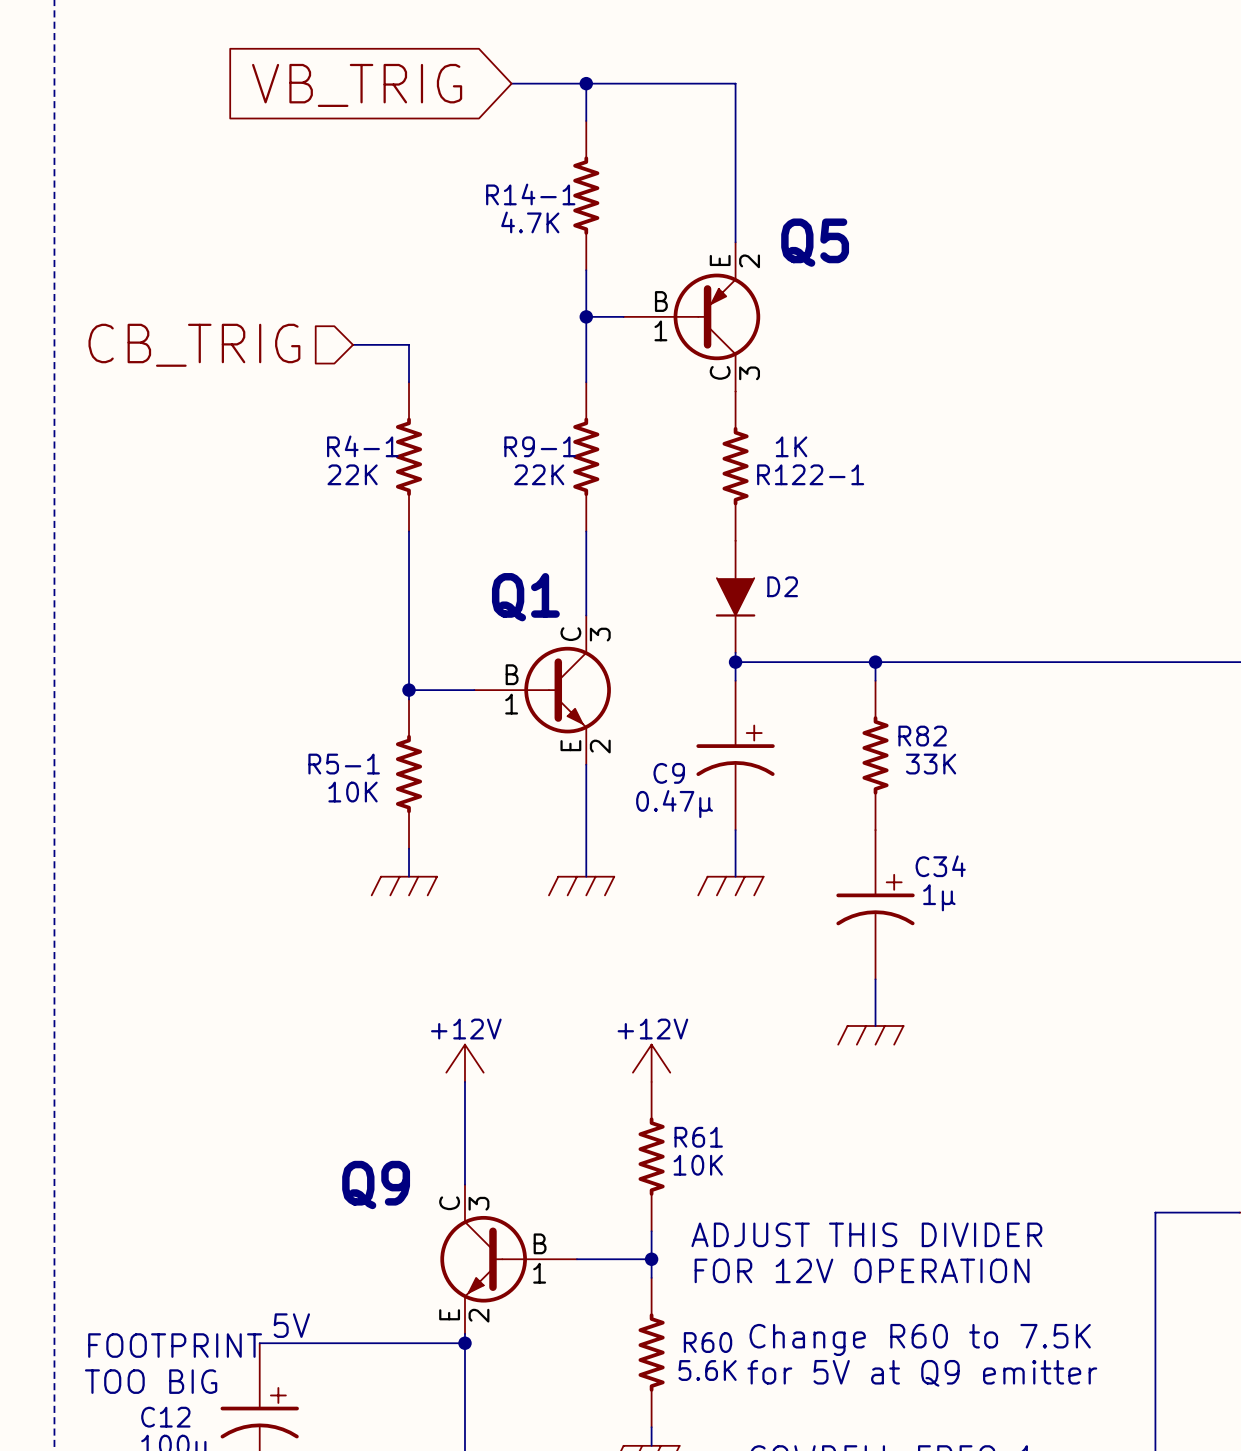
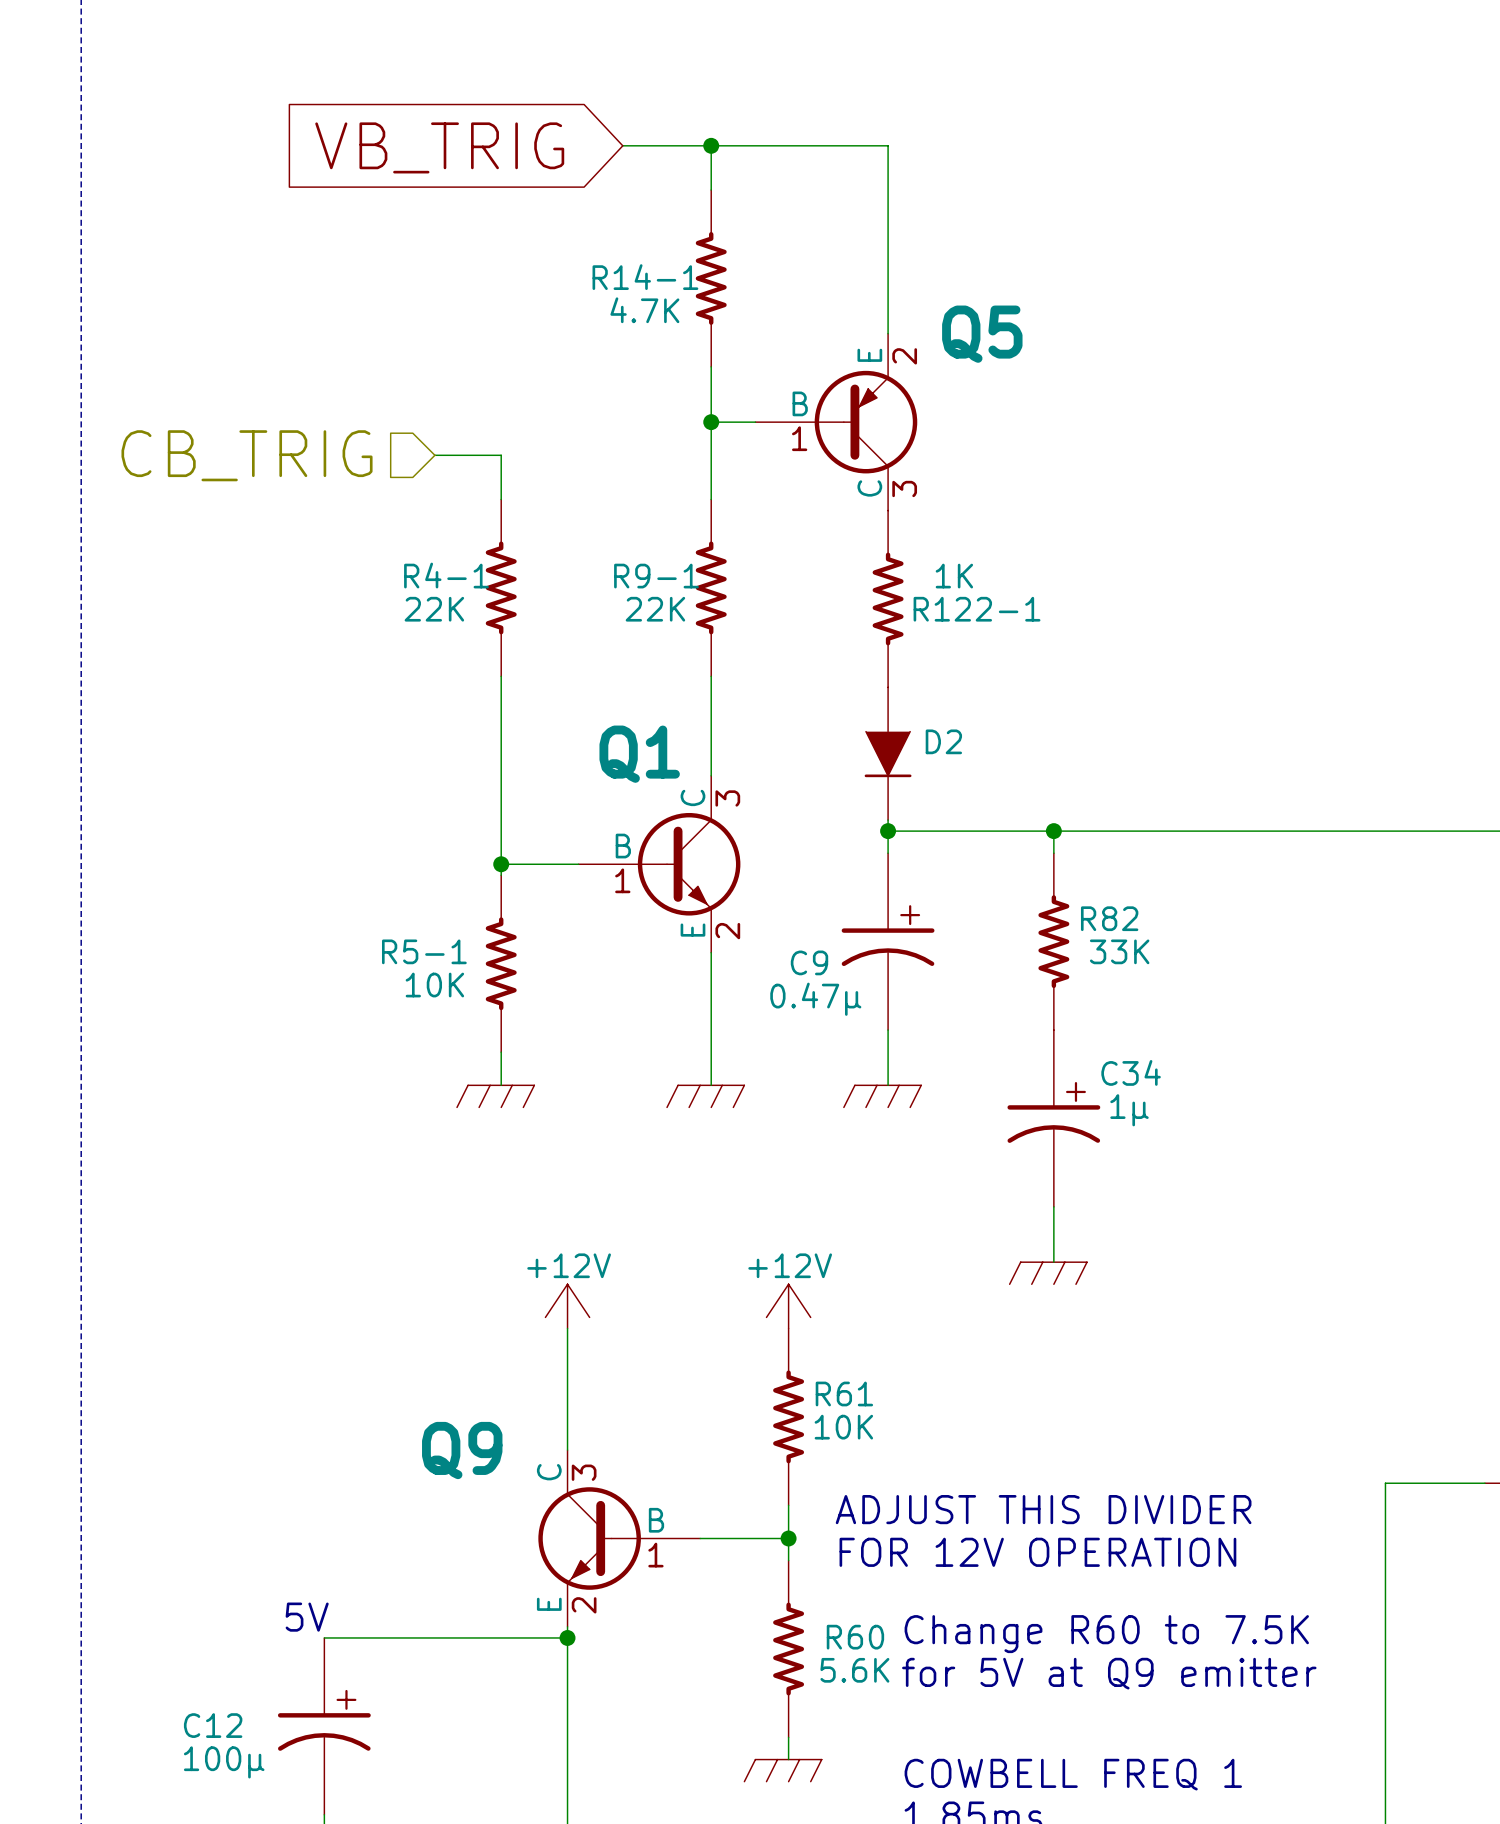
text position: 5V (291, 1325) -> 5V (307, 1617)
text: FOOTPRINT (175, 1345) -> none
text: TOO BIG (151, 1381) -> none

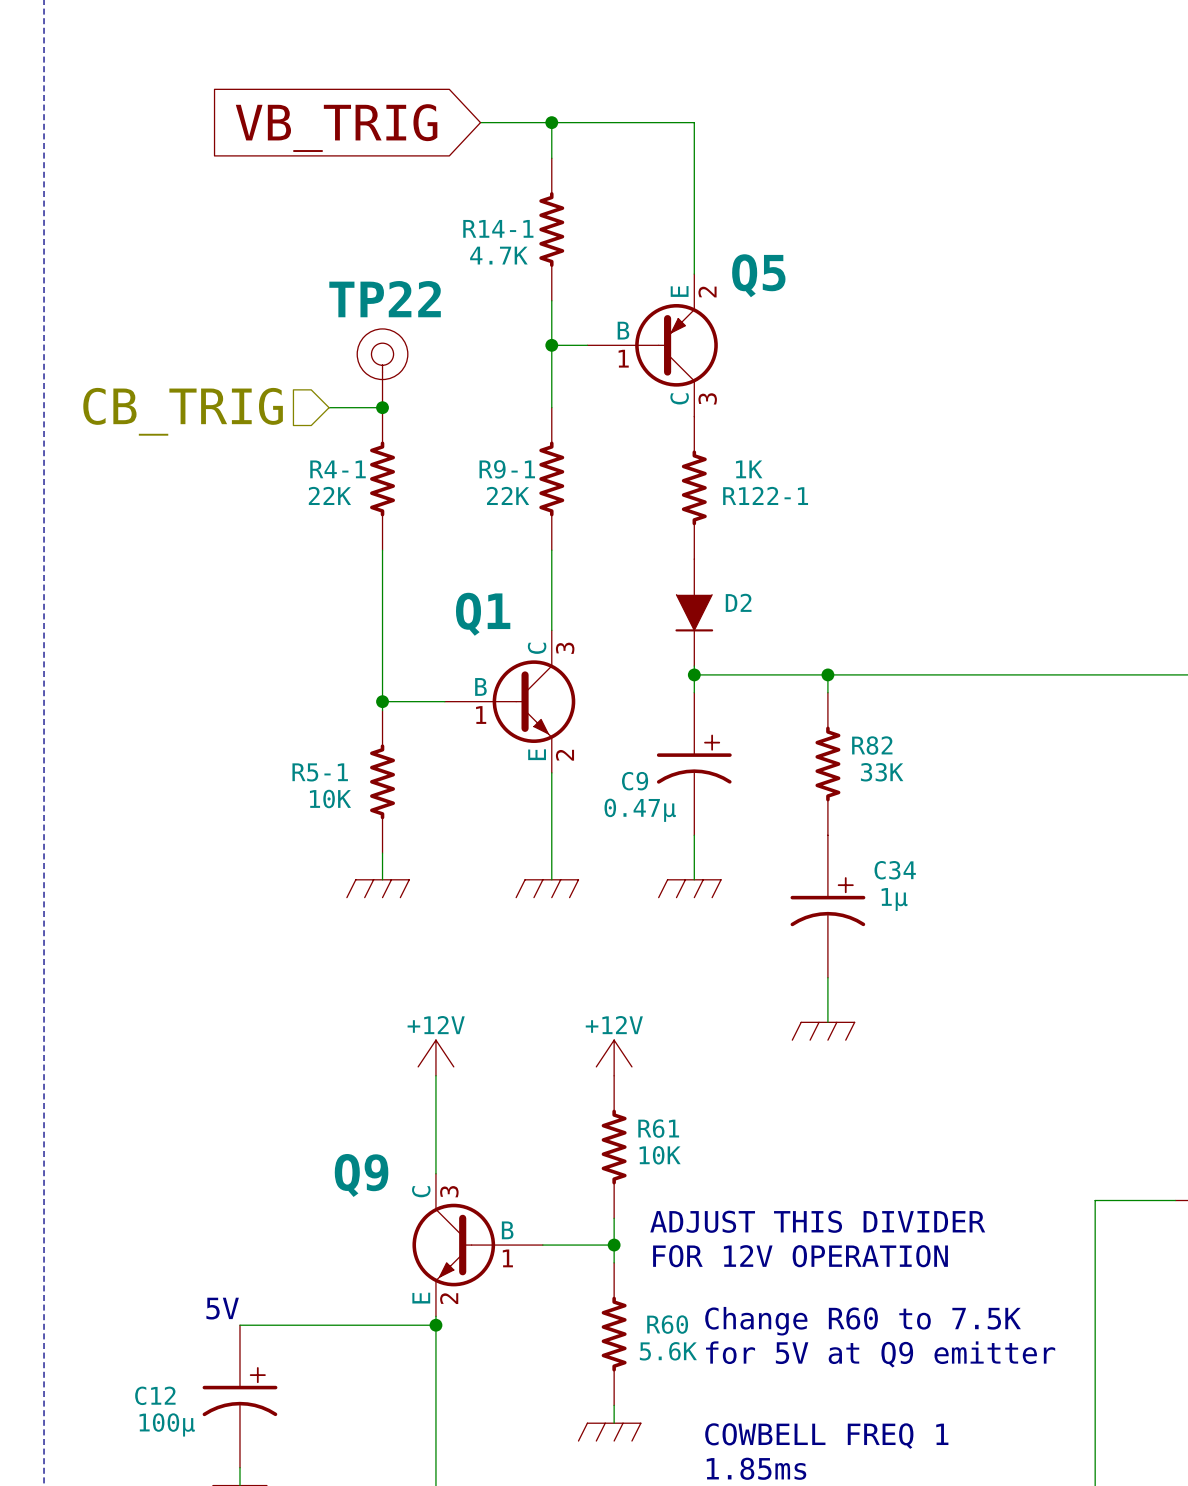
TP22: none -> (382, 368)
hierarchical label position: CB_TRIG (247, 455) -> CB_TRIG (183, 411)
wire: (434, 455) (501, 455) (501, 499) -> (329, 407) (382, 407)
junction: none -> (382, 407)

